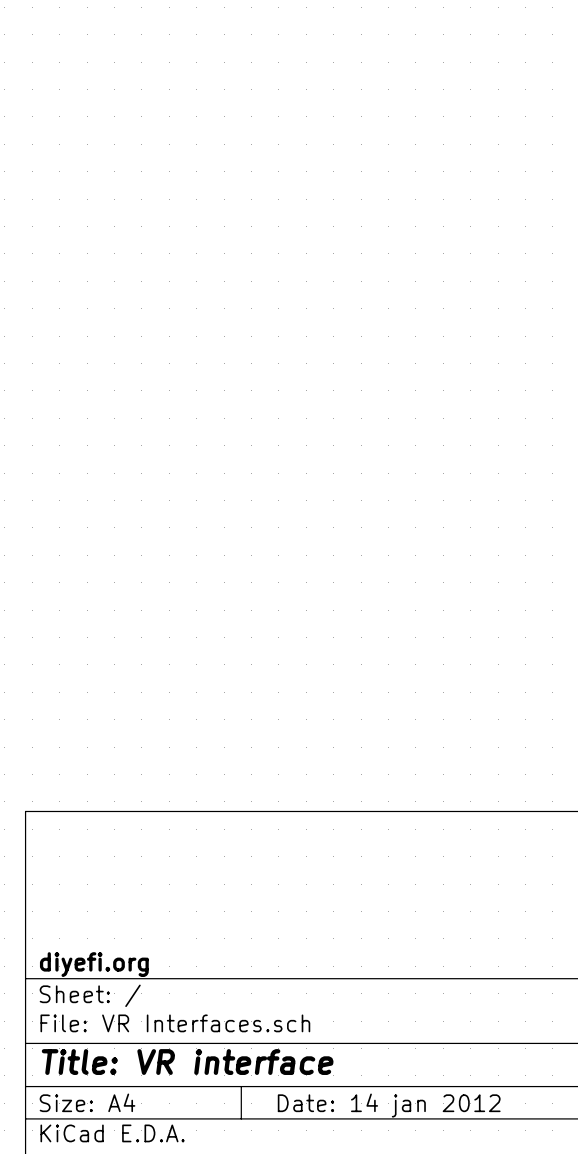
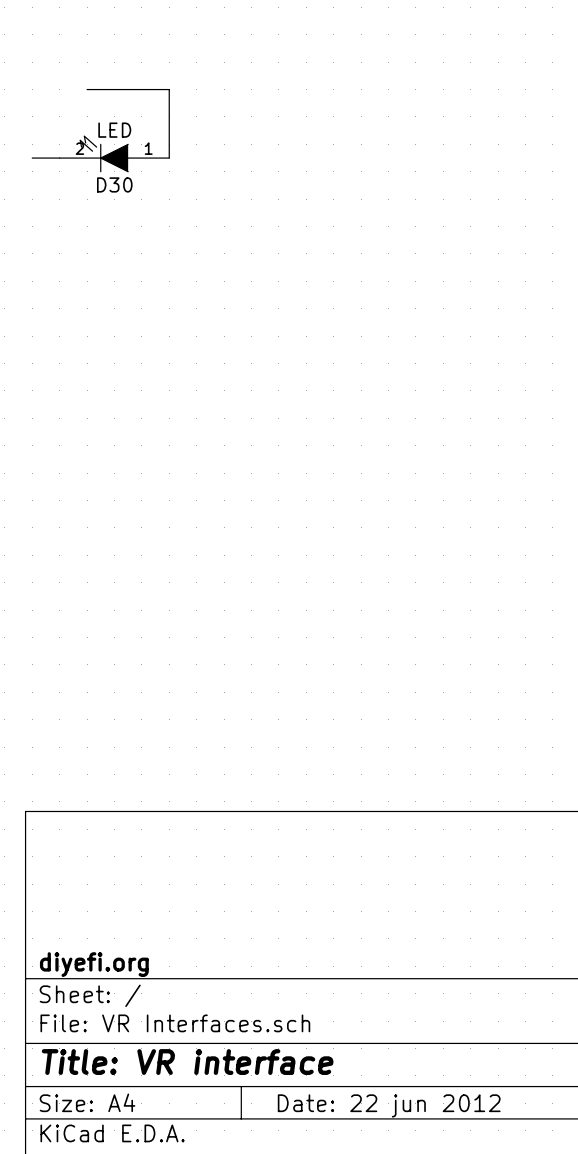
wire: none -> (87, 89) (169, 89) (169, 158)
D30: none -> LED (114, 153)
wire: none -> (32, 158) (59, 158)
title block: Date: 14 jan 2012 (389, 1105) -> Date: 22 jun 2012 (389, 1105)

